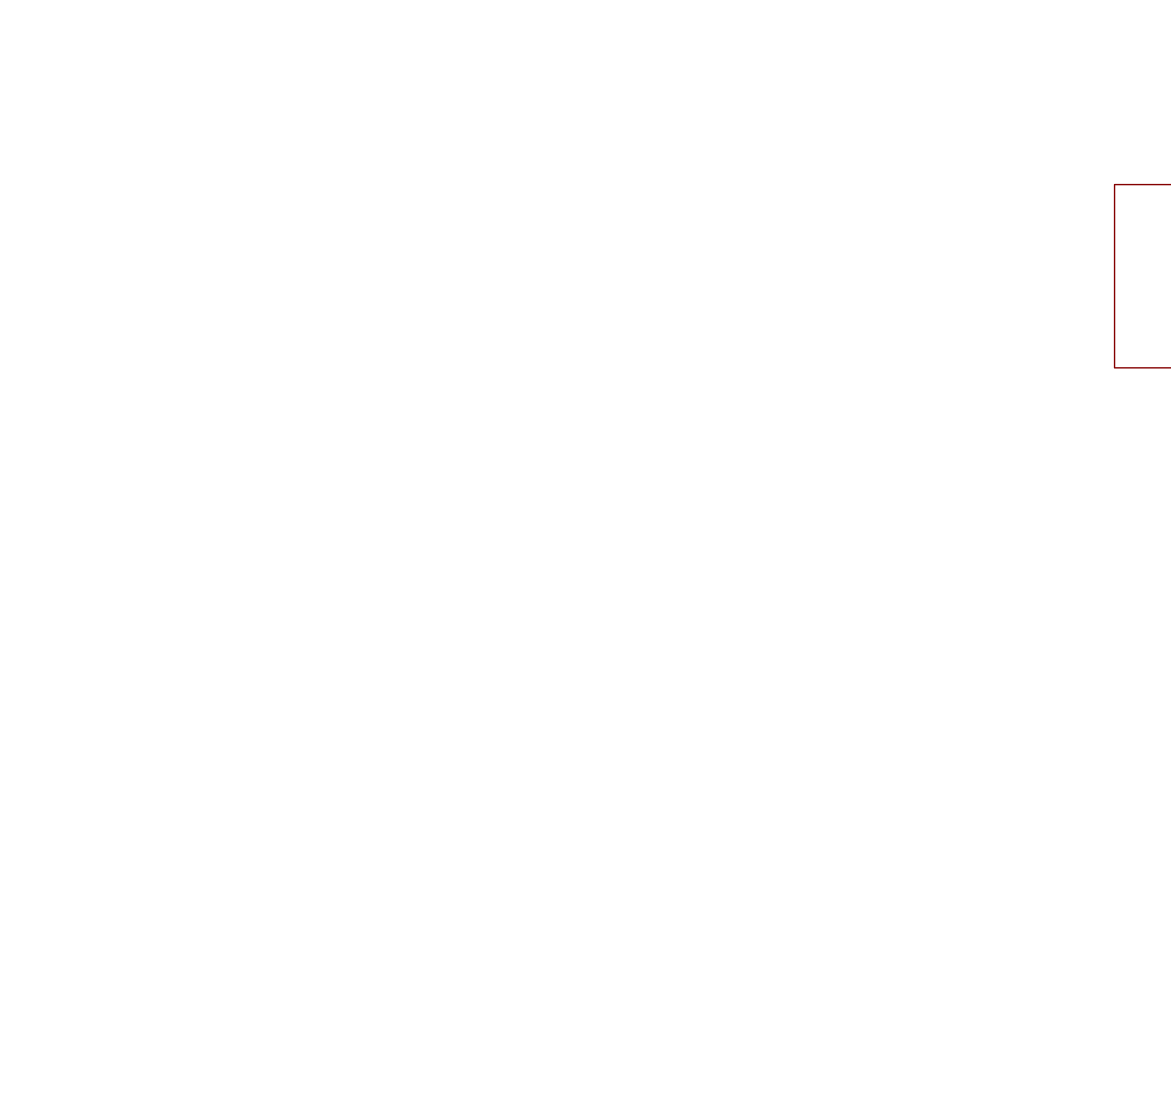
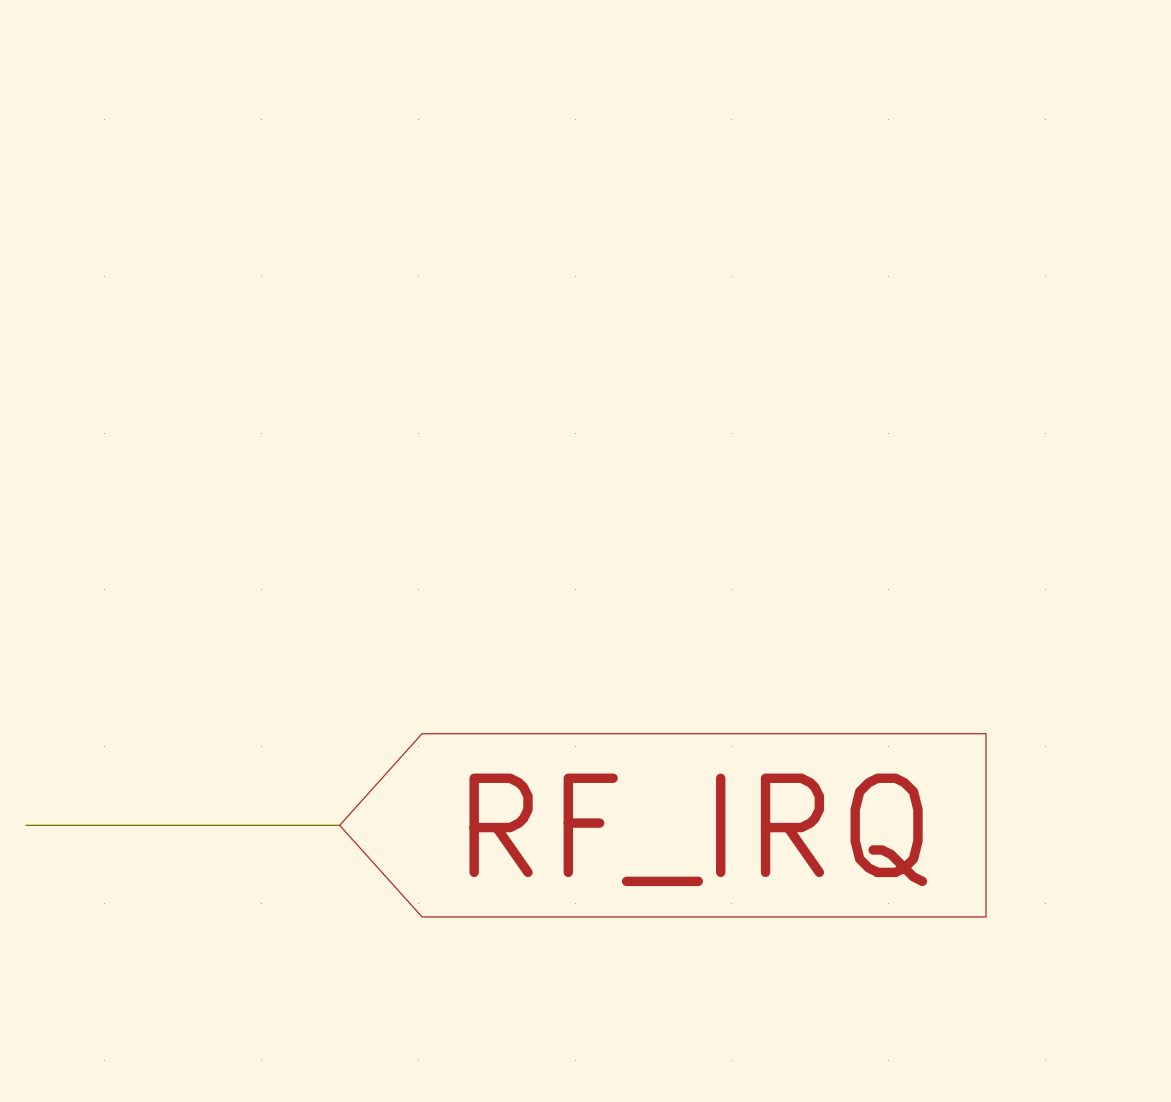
wire: none -> (25, 825) (339, 825)
global label: none -> RF_IRQ (698, 829)

